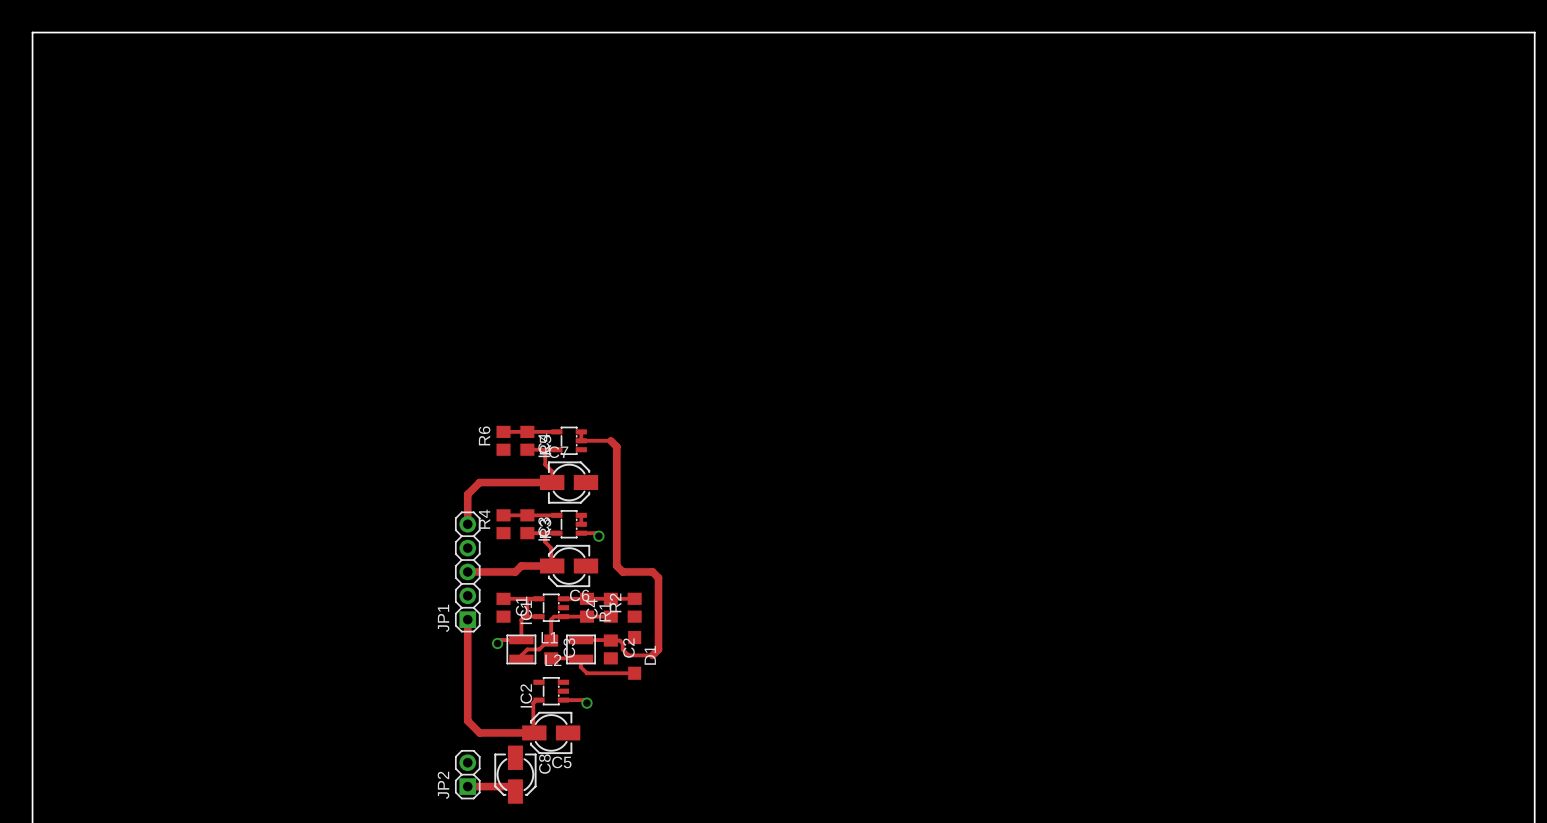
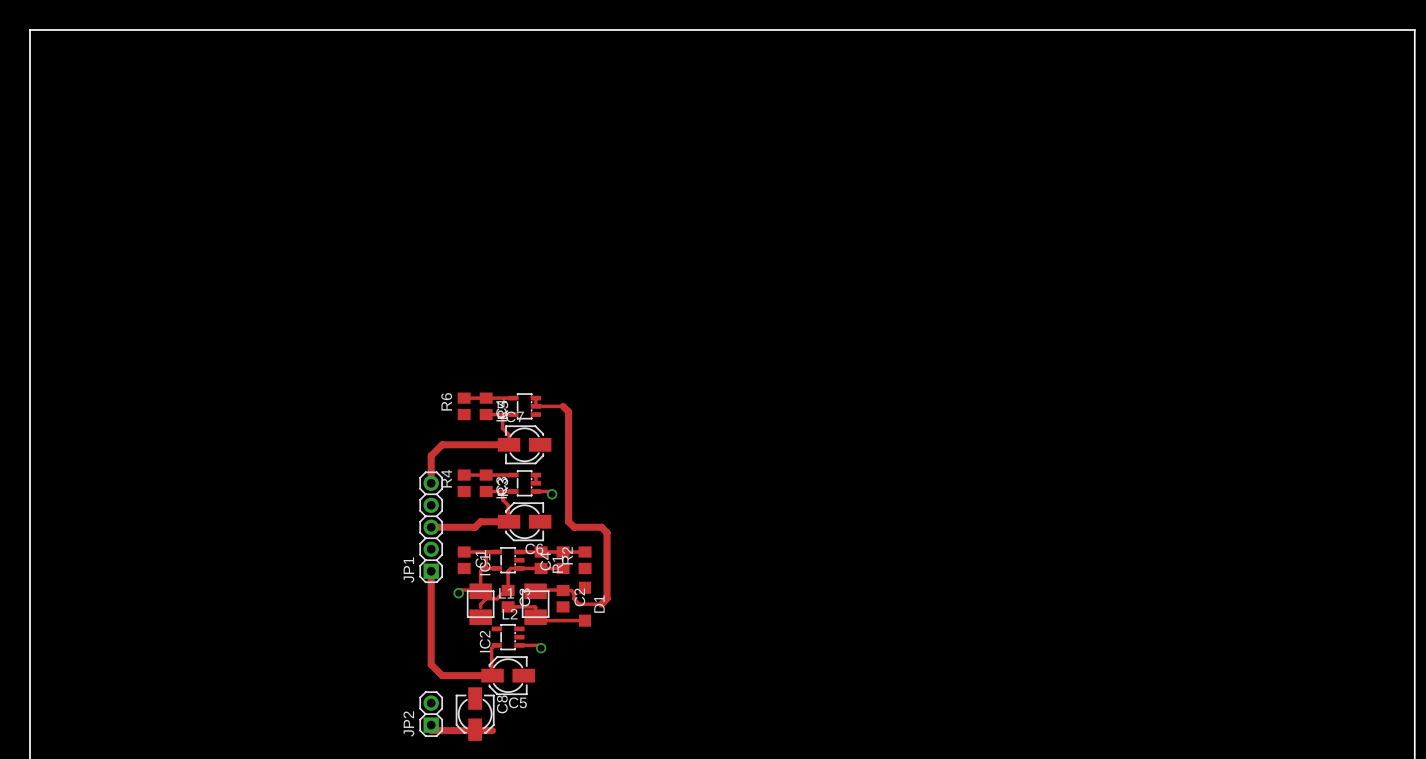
L1 footprint: [506, 634, 537, 665] -> [467, 583, 495, 625]
L2 footprint: [566, 634, 596, 665] -> [522, 583, 550, 625]
track: (467, 786) (516, 786) (515, 791) -> none
track: none -> (431, 730) (492, 730)

